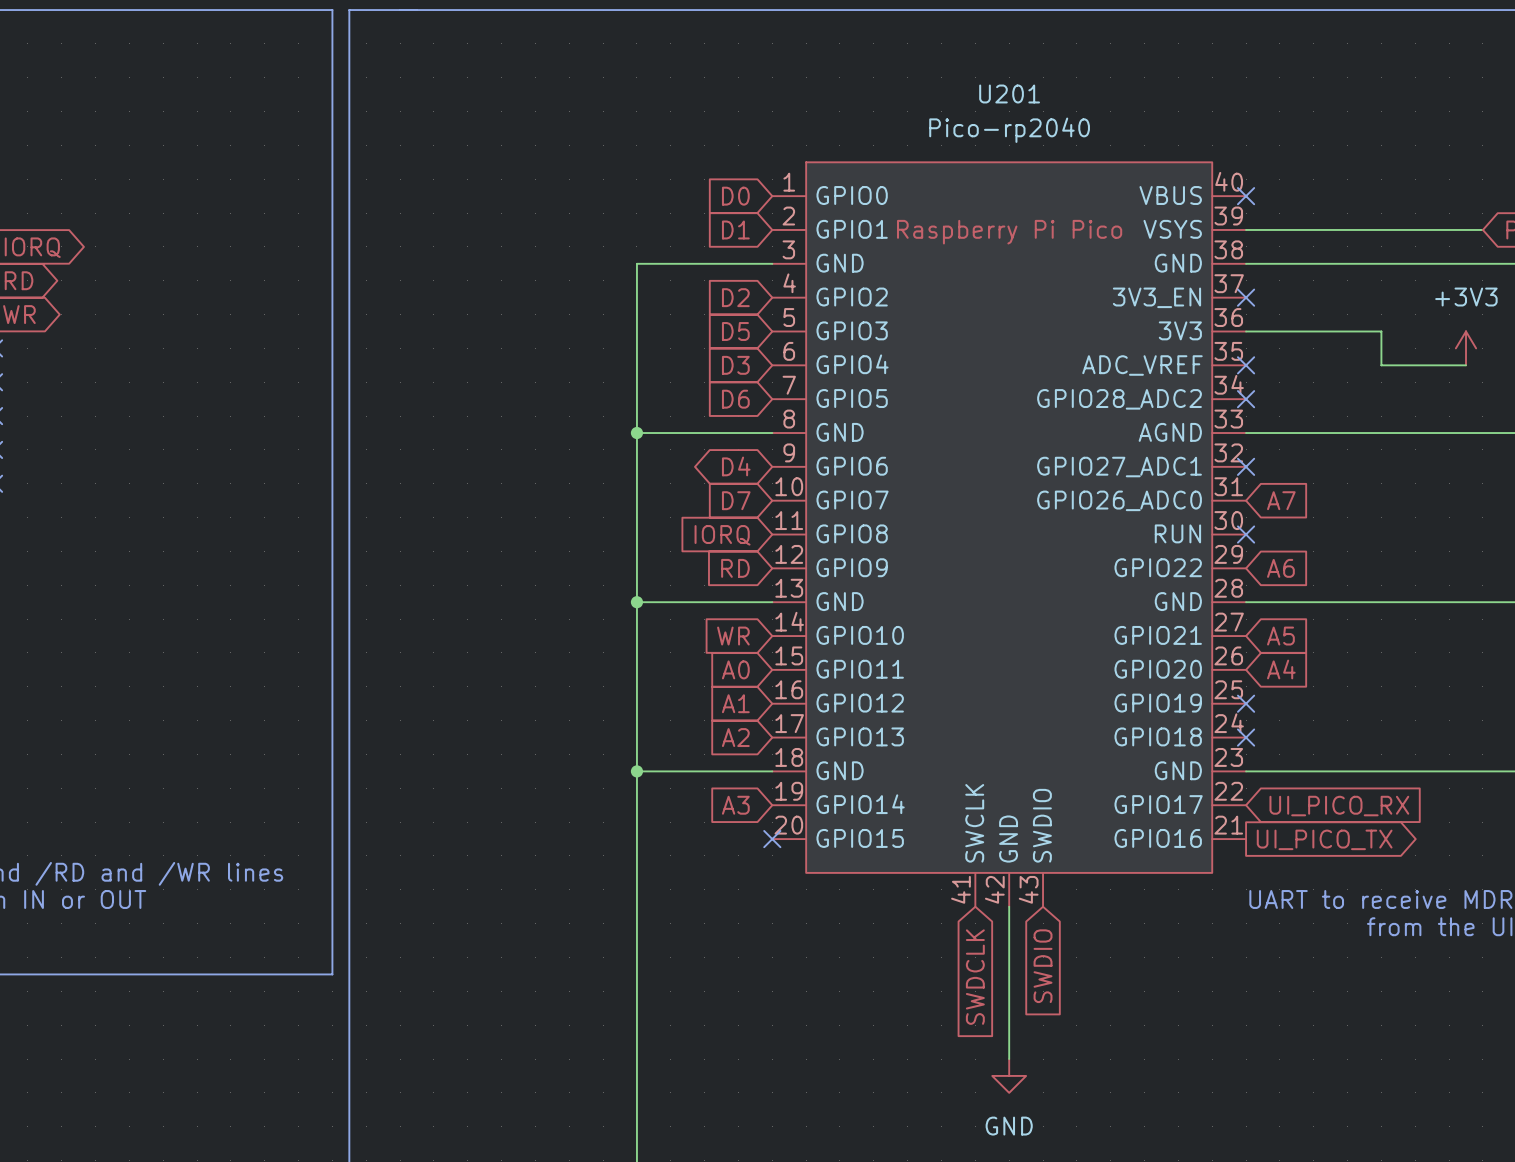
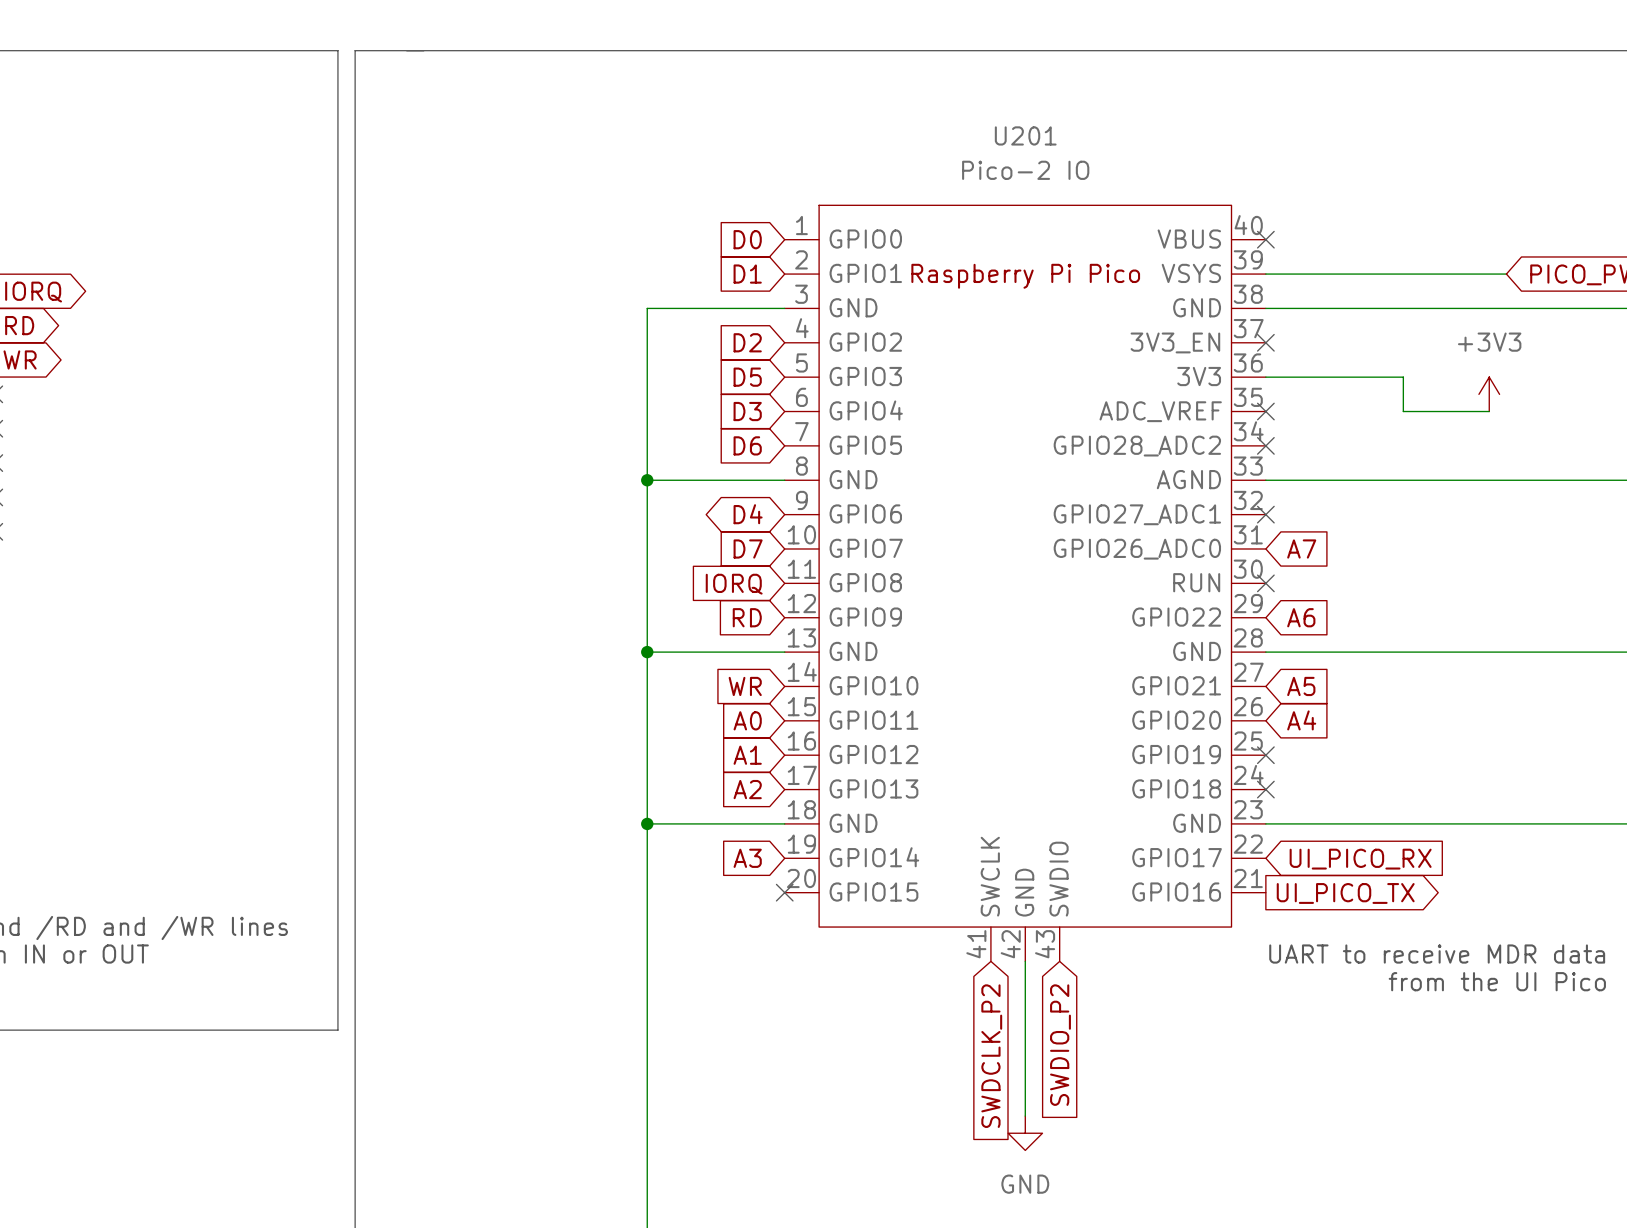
U201 value: Pico-rp2040 (1009, 130) -> Pico-2 IO (1025, 170)
global label: SWDIO (1043, 966) -> SWDIO_P2 (1060, 1045)
global label: SWDCLK (975, 977) -> SWDCLK_P2 (991, 1056)

